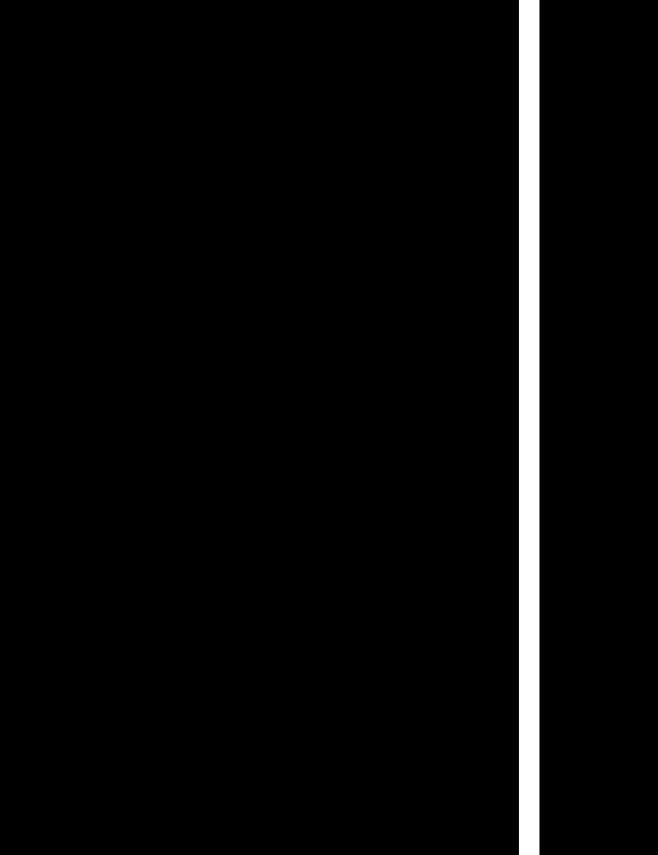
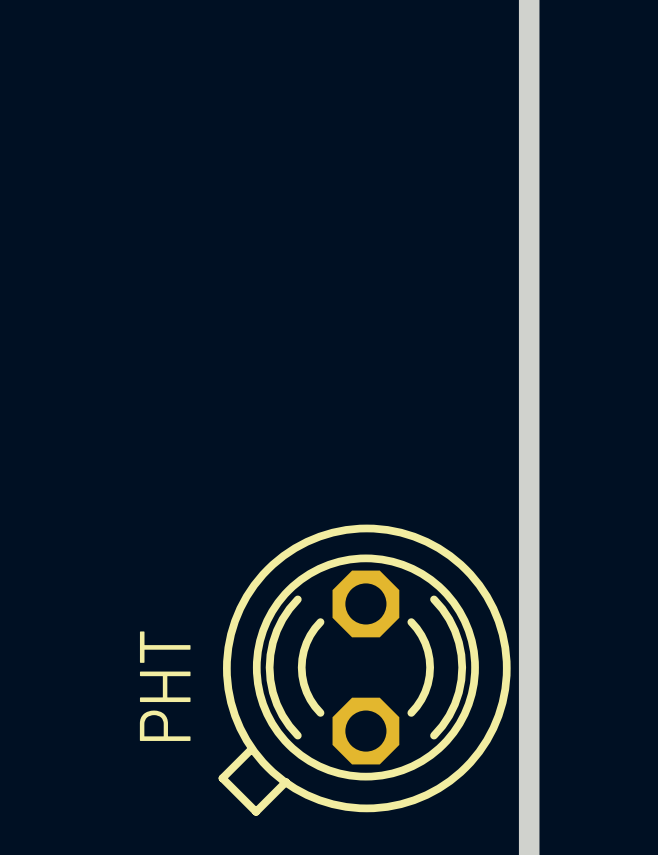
PHT: none -> (364, 670)

